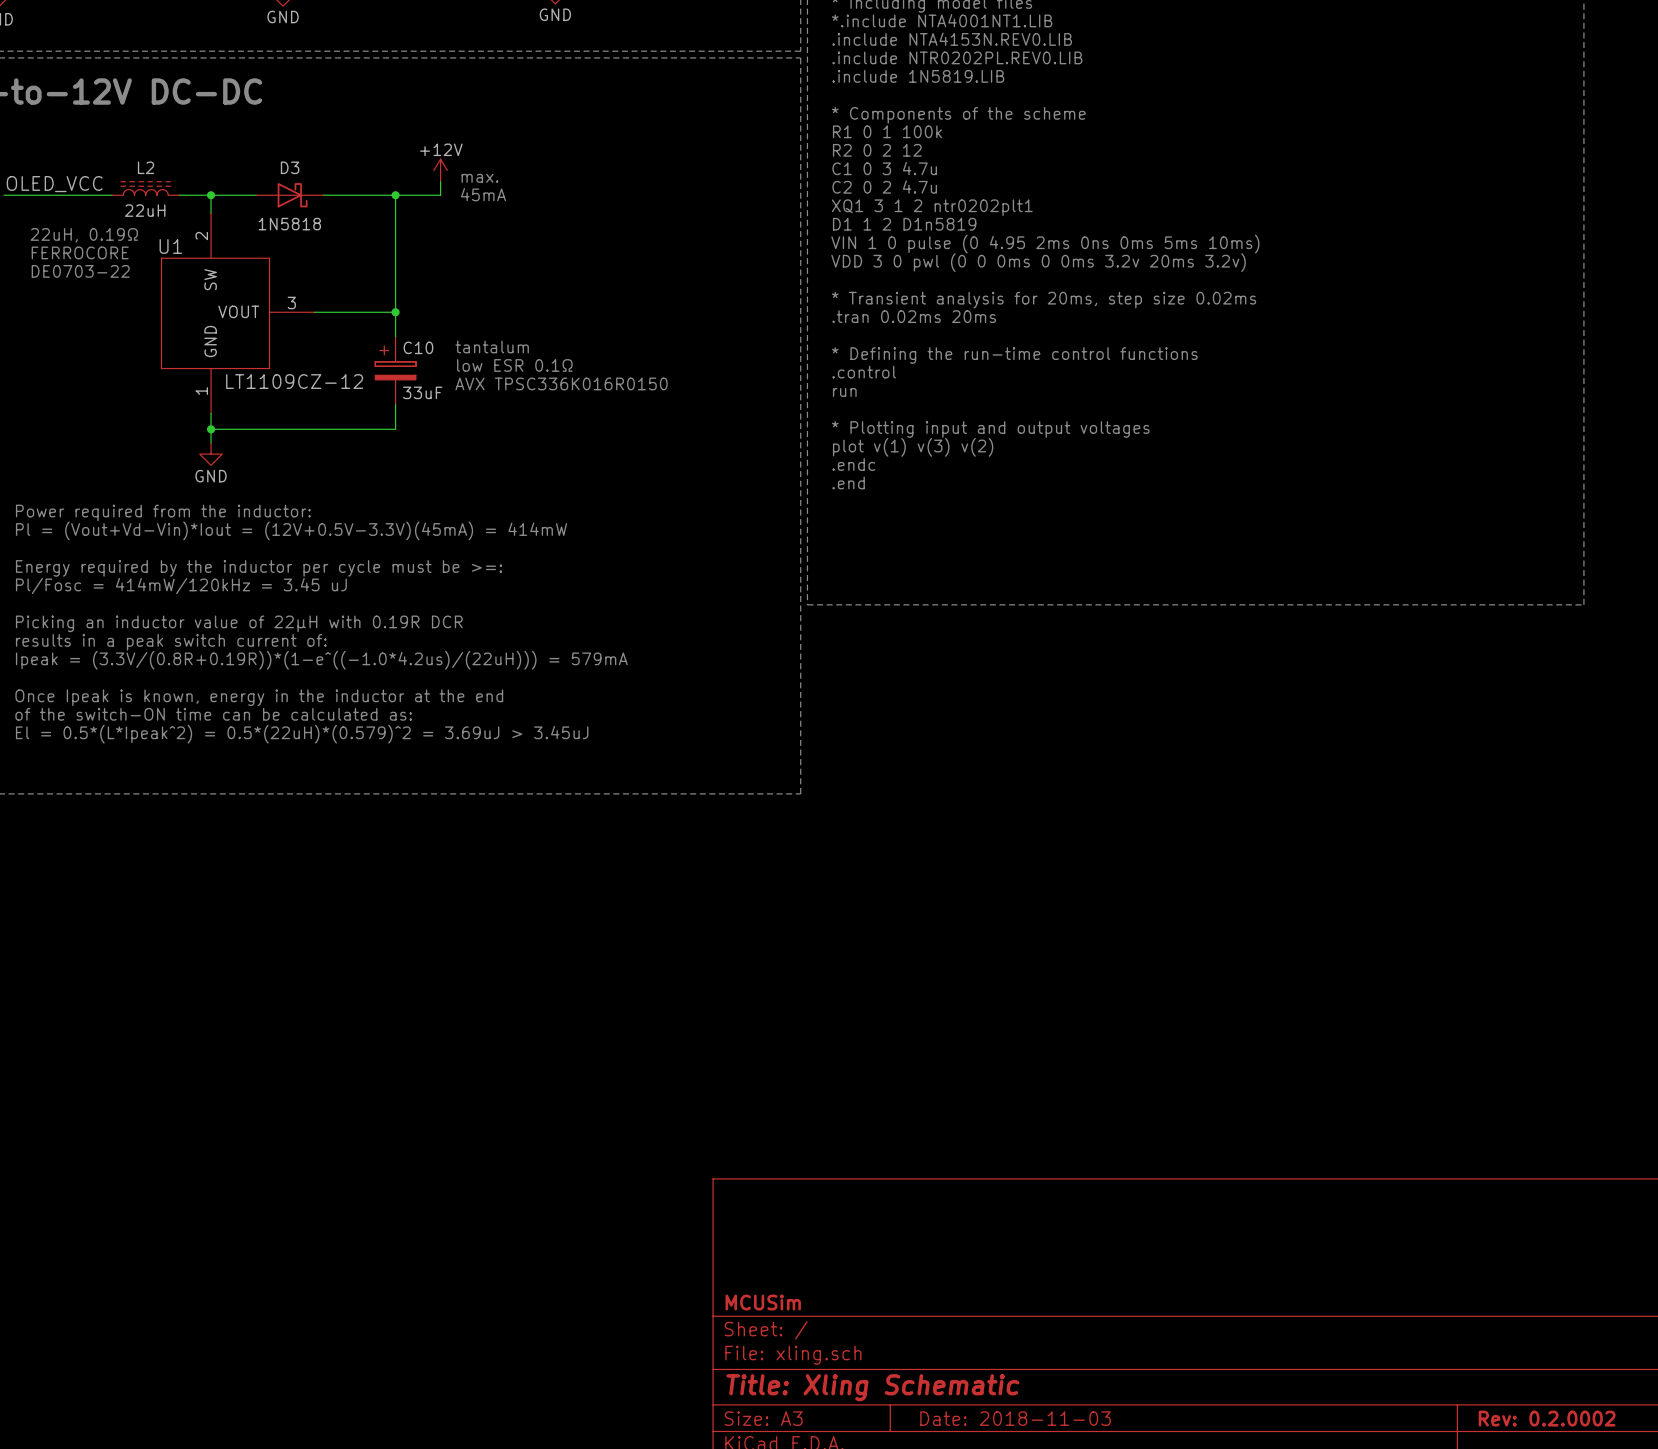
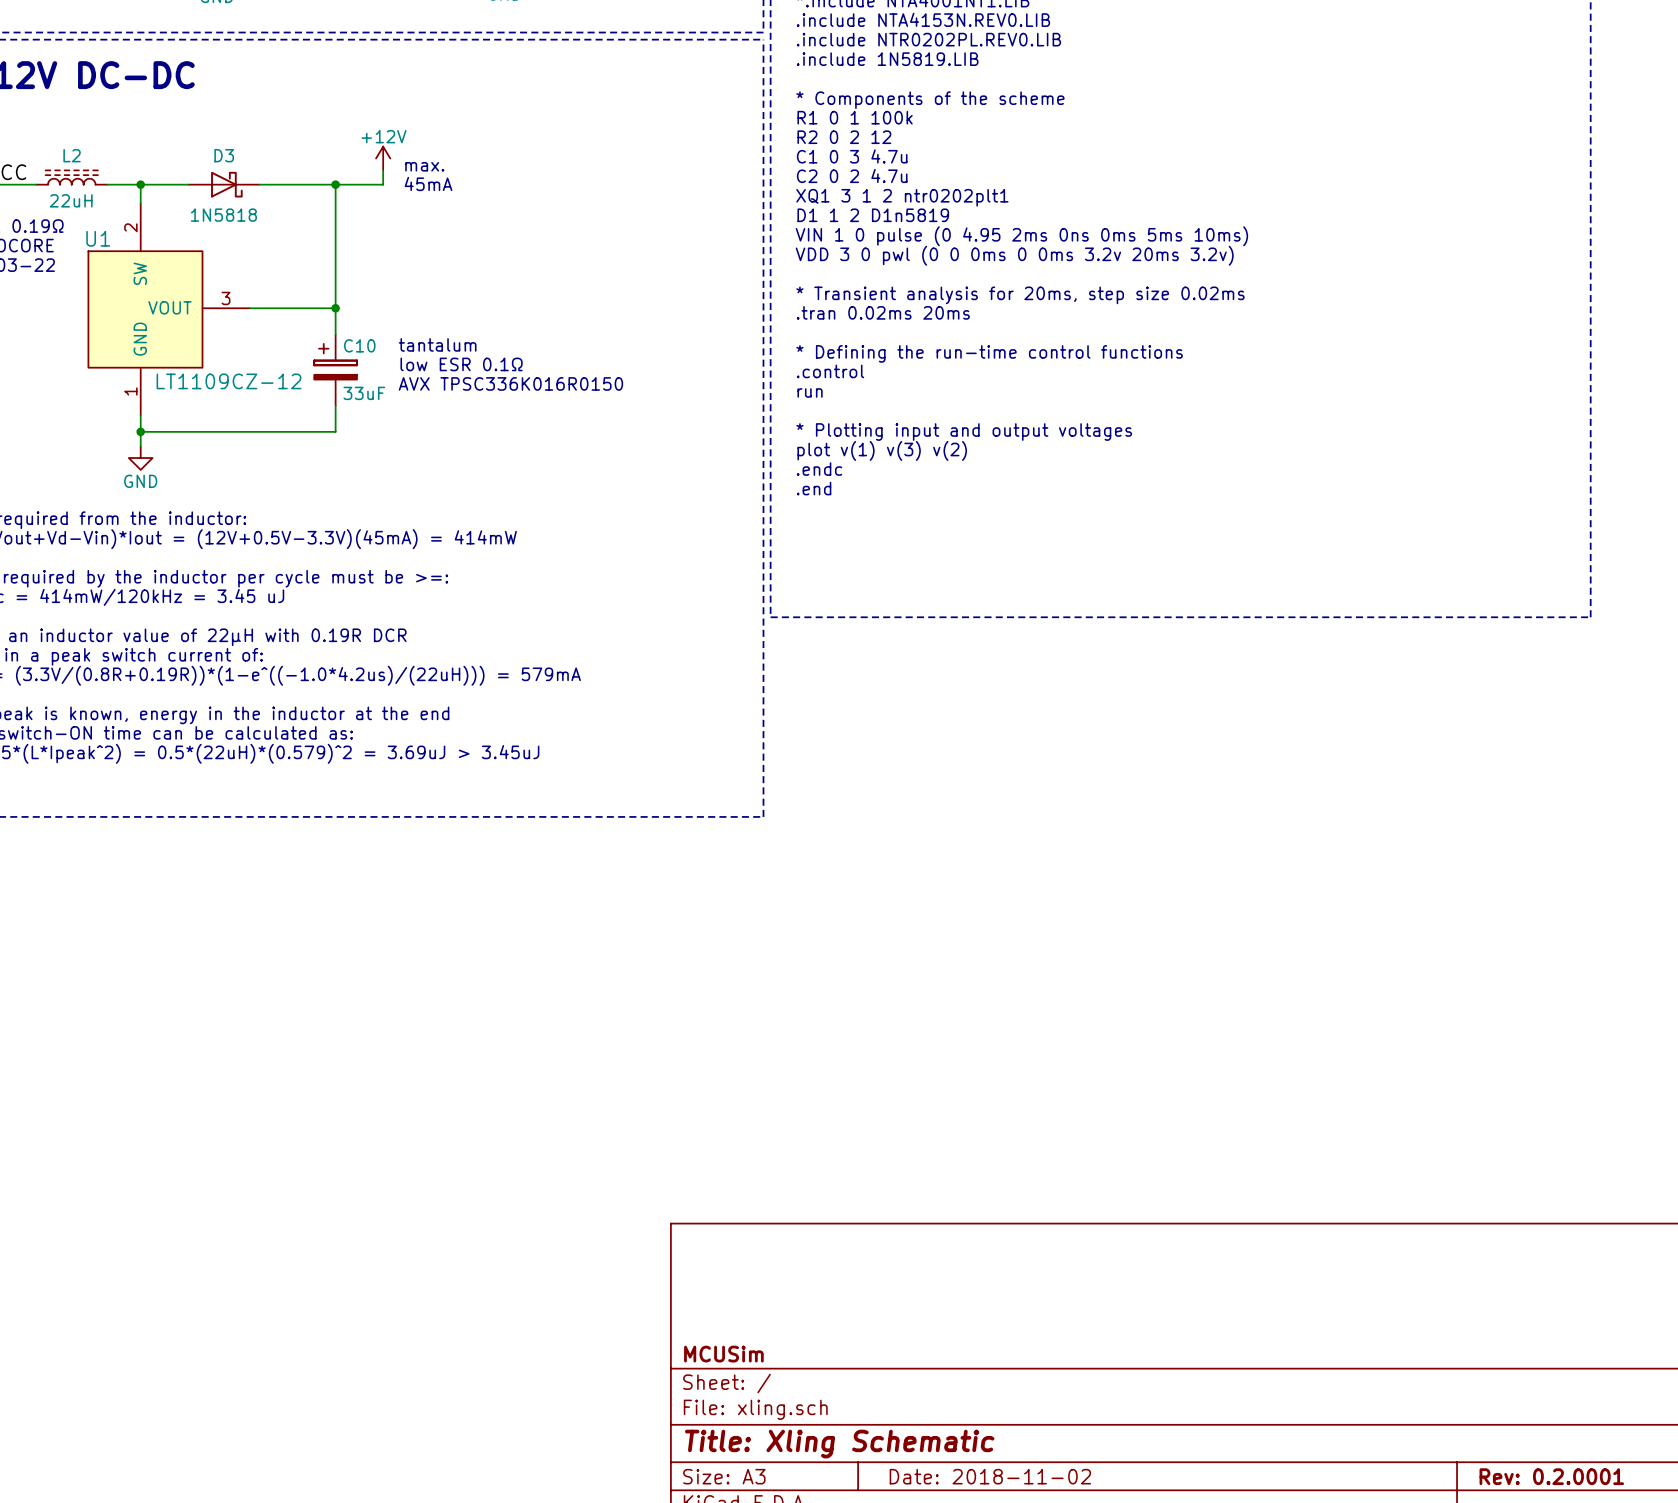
title block: Date: 2018-11-03 (1015, 1418) -> Date: 2018-11-02 (990, 1476)
title block: Rev: 0.2.0002 (1547, 1418) -> Rev: 0.2.0001 (1551, 1476)

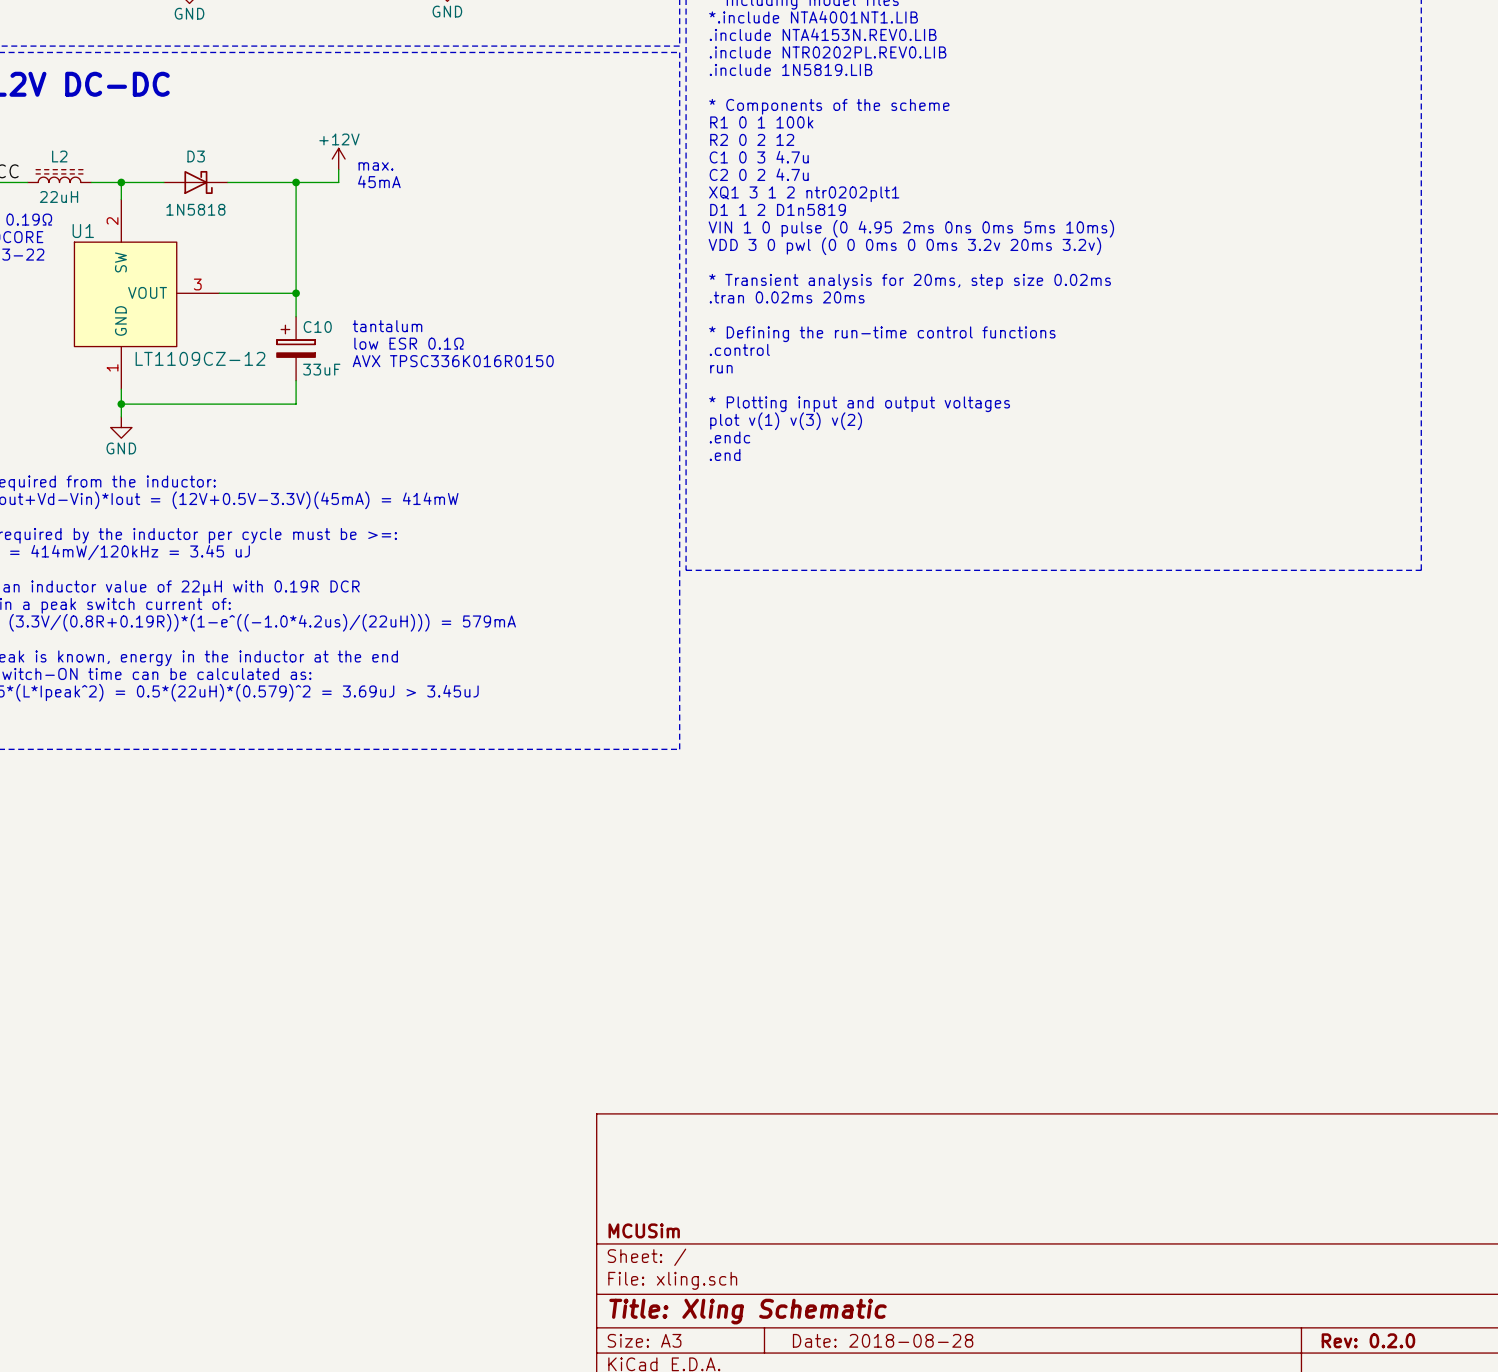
title block: Date: 2018-11-02 (990, 1476) -> Date: 2018-08-28 (883, 1340)
title block: Rev: 0.2.0001 (1551, 1476) -> Rev: 0.2.0 (1368, 1340)

